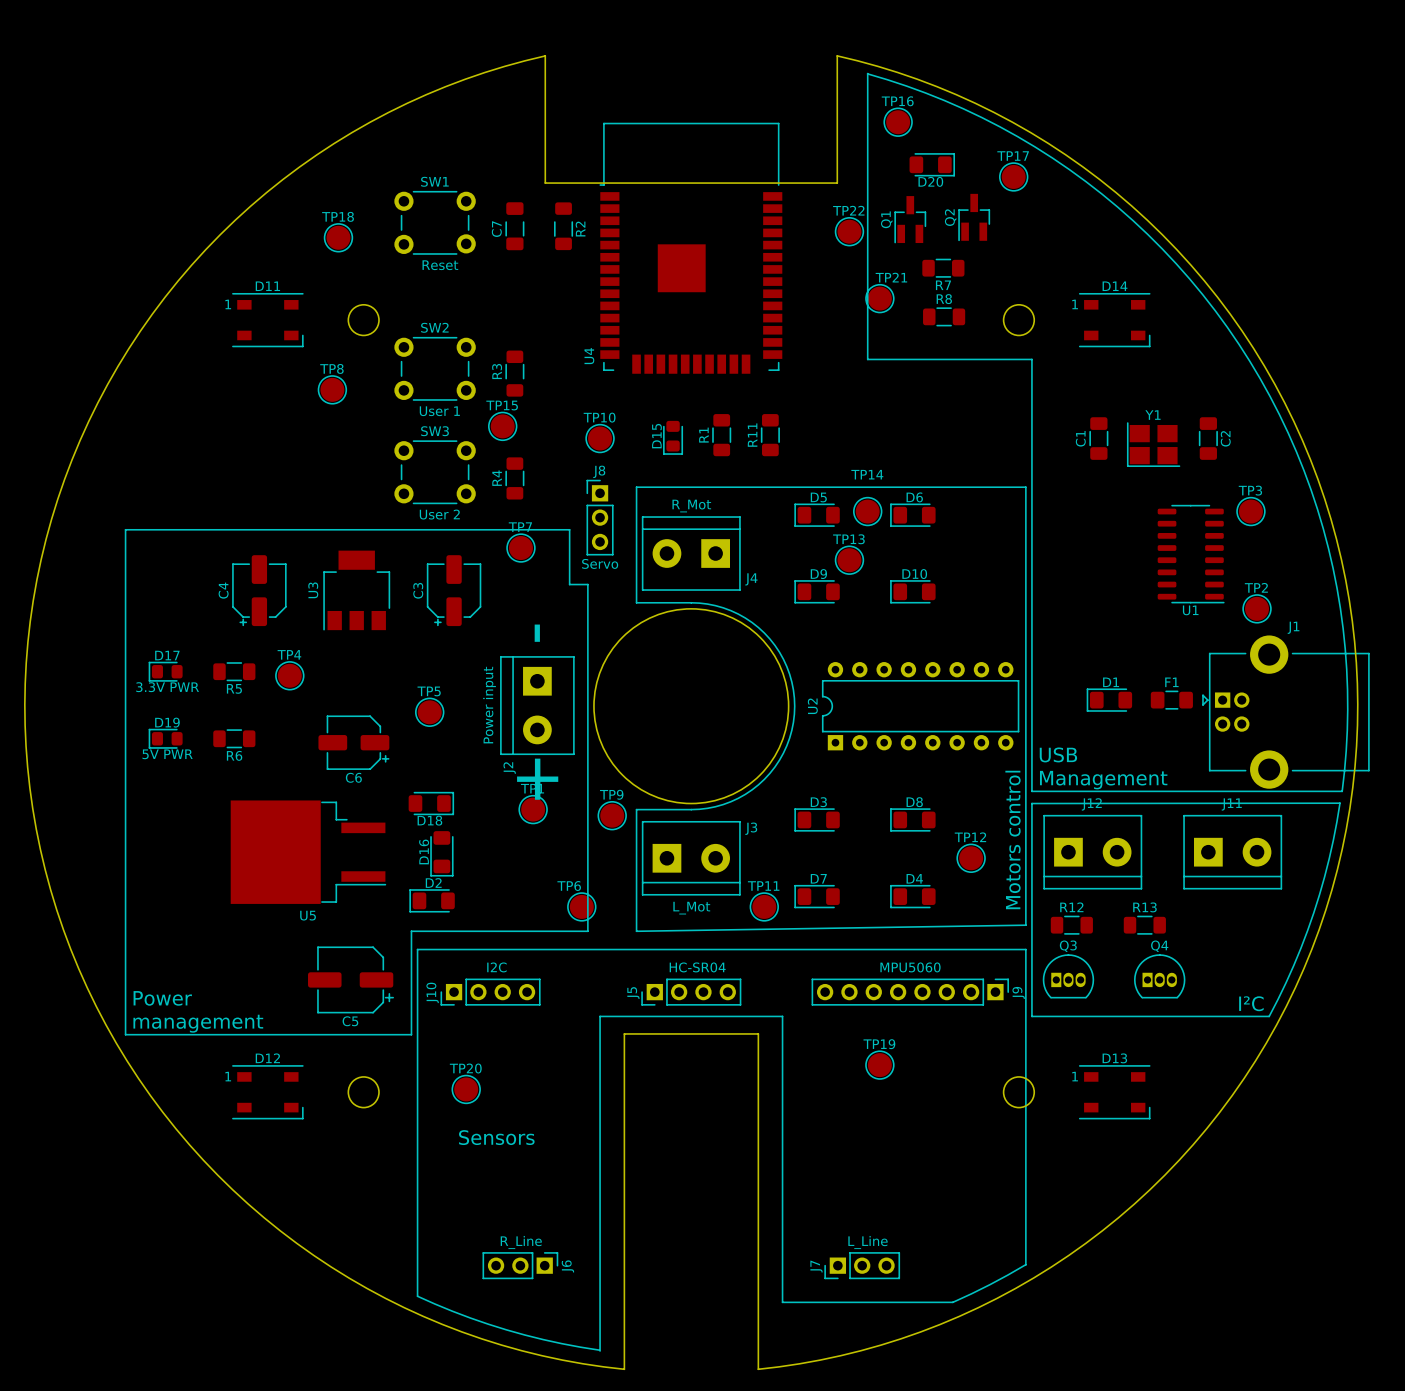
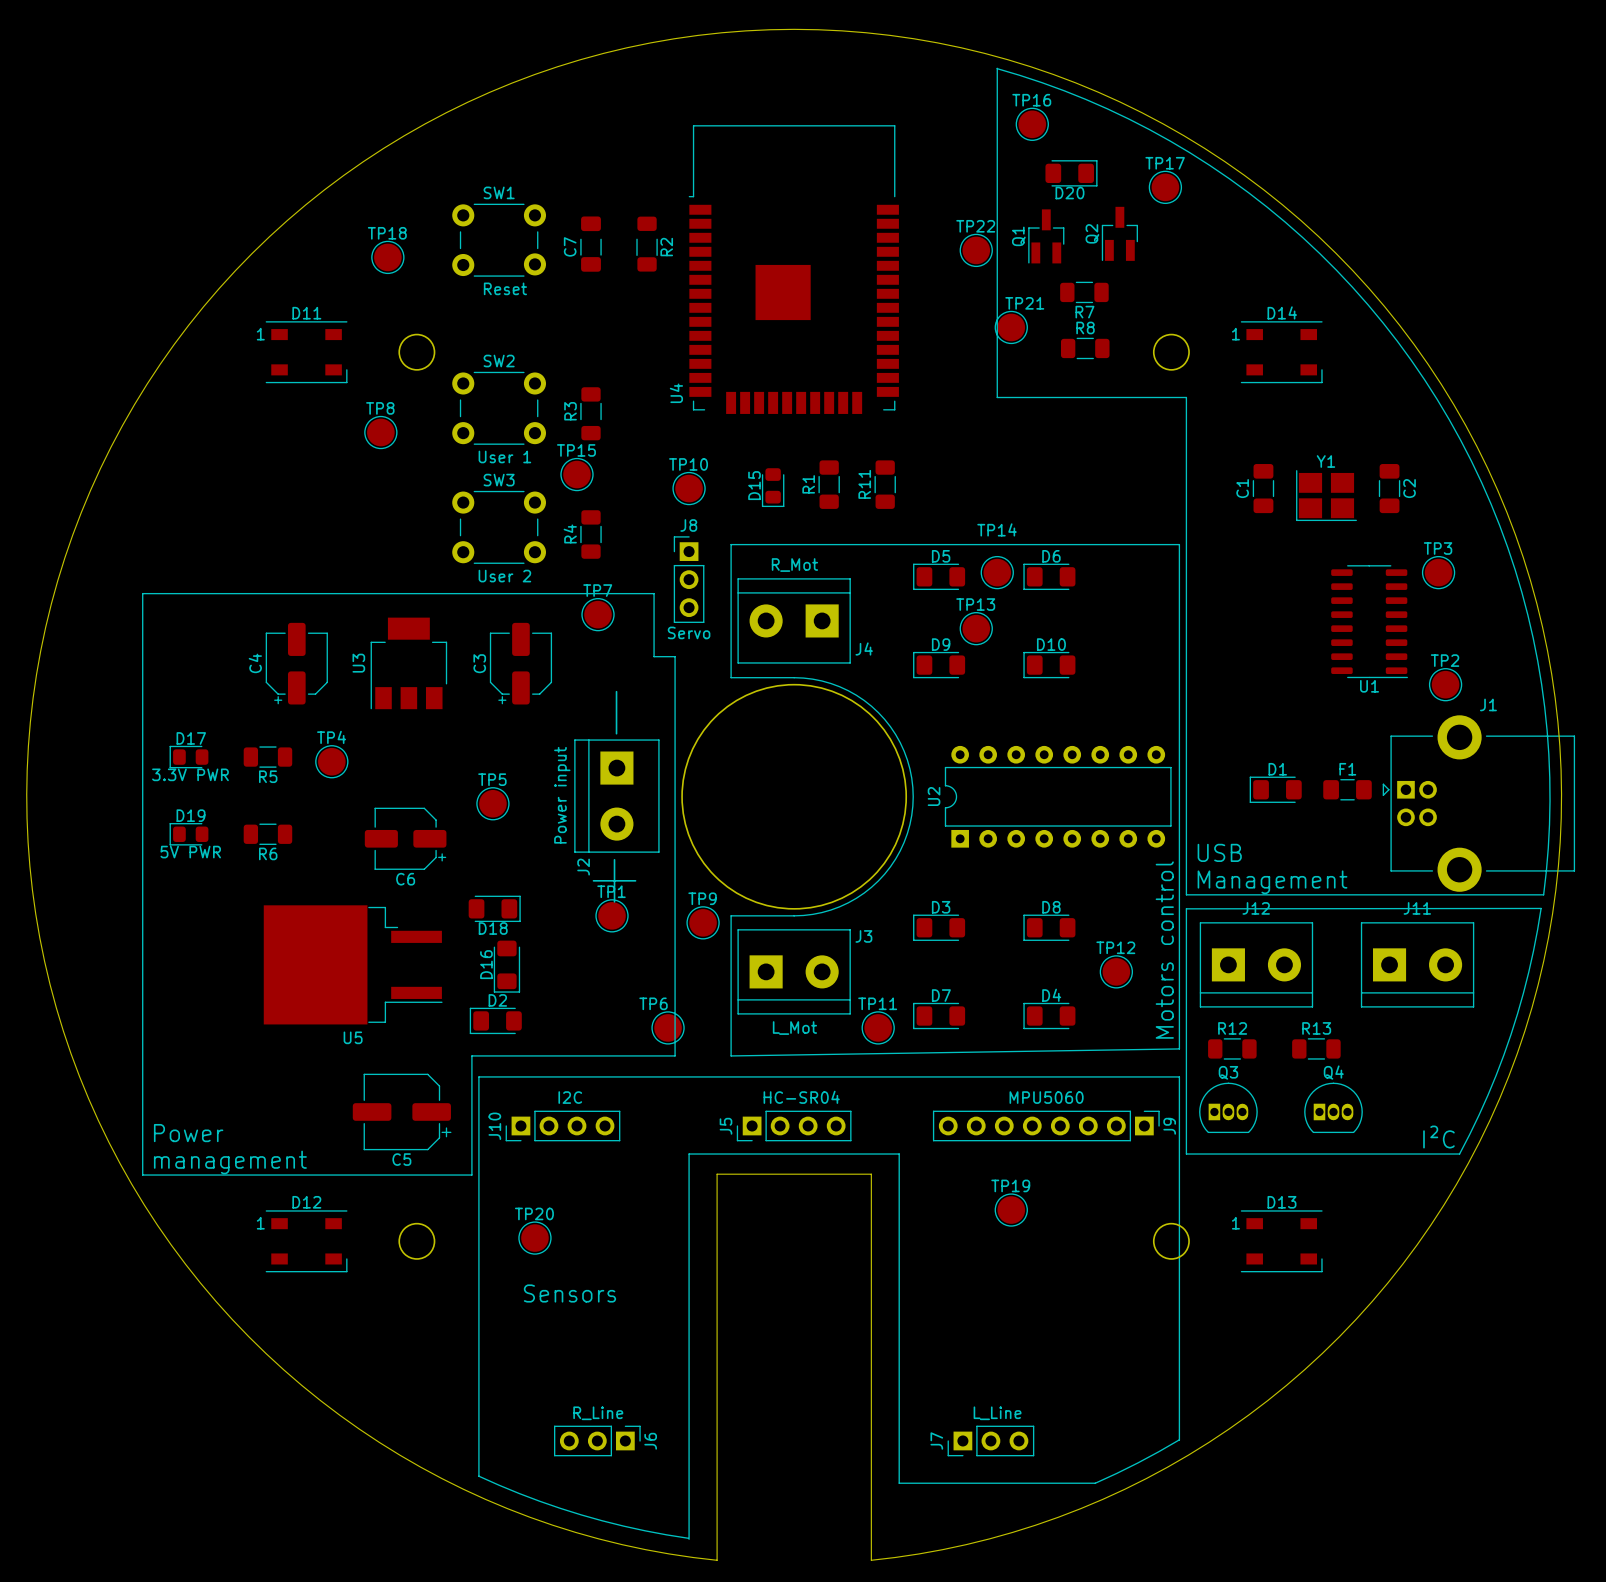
board edge: (624, 1369) (562, 1360) (501, 1345) (423, 1316) (367, 1288) (313, 1255) (264, 1217) (217, 1175) (162, 1112) (127, 1061) (96, 1006) (70, 949) (45, 869) (29, 787) (25, 725) (26, 662) (33, 600) (51, 519) (72, 459) (97, 402) (128, 348) (165, 297) (205, 249) (266, 192) (316, 154) (370, 122) (426, 94) (484, 72) (545, 55) (545, 183) (837, 183) (837, 55) (897, 72) (956, 94) (1012, 122) (1065, 154) (1099, 179) (1147, 220) (1190, 265) (1230, 313) (1253, 348) (1284, 402) (1310, 459) (1330, 519) (1345, 579) (1354, 641) (1357, 683) (1356, 746) (1349, 808) (1342, 849) (1325, 909) (1303, 968) (1286, 1006) (1255, 1060) (1219, 1112) (1179, 1160) (1134, 1203) (1085, 1243) (1033, 1278) (978, 1307) (920, 1331) (860, 1350) (820, 1360) (758, 1369) -> (717, 1560) (645, 1549) (575, 1532) (507, 1508) (441, 1478) (379, 1442) (320, 1400) (266, 1353) (216, 1301) (171, 1245) (131, 1184) (98, 1120) (71, 1053) (50, 984) (35, 914) (28, 842) (27, 770) (33, 698) (45, 627) (64, 557) (90, 490) (122, 425) (160, 364) (203, 306) (252, 253) (305, 204) (363, 161) (425, 123) (467, 102) (512, 83) (580, 59) (650, 42) (721, 32) (794, 29) (866, 32) (937, 42) (1007, 59) (1075, 82) (1141, 112) (1204, 148) (1263, 189) (1318, 236) (1368, 288) (1414, 344) (1453, 404) (1487, 468) (1515, 534) (1536, 603) (1551, 674) (1559, 746) (1561, 818) (1555, 890) (1548, 937) (1538, 984) (1517, 1053) (1489, 1120) (1456, 1184) (1417, 1244) (1372, 1301) (1322, 1353) (1267, 1400) (1208, 1442) (1146, 1478) (1080, 1508) (1012, 1532) (942, 1549) (871, 1560)

